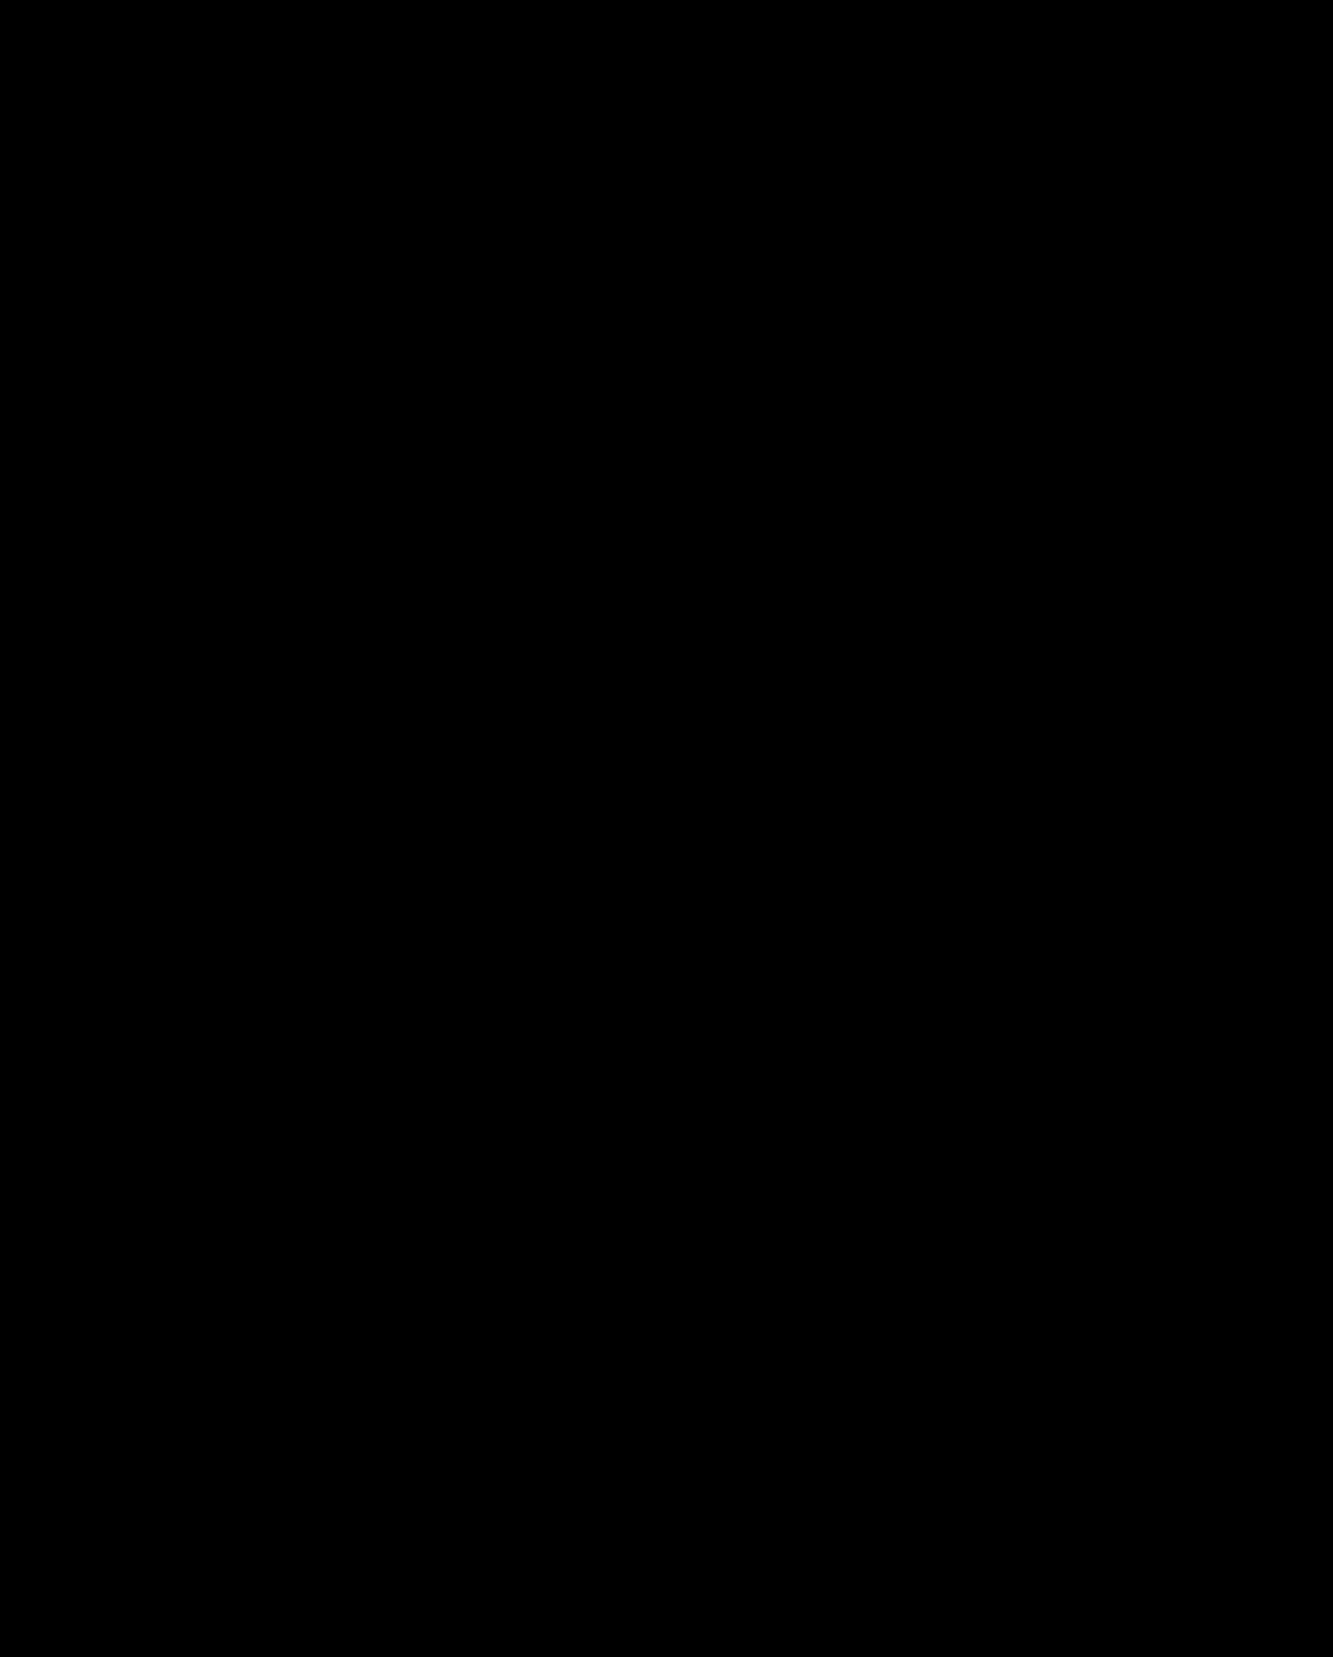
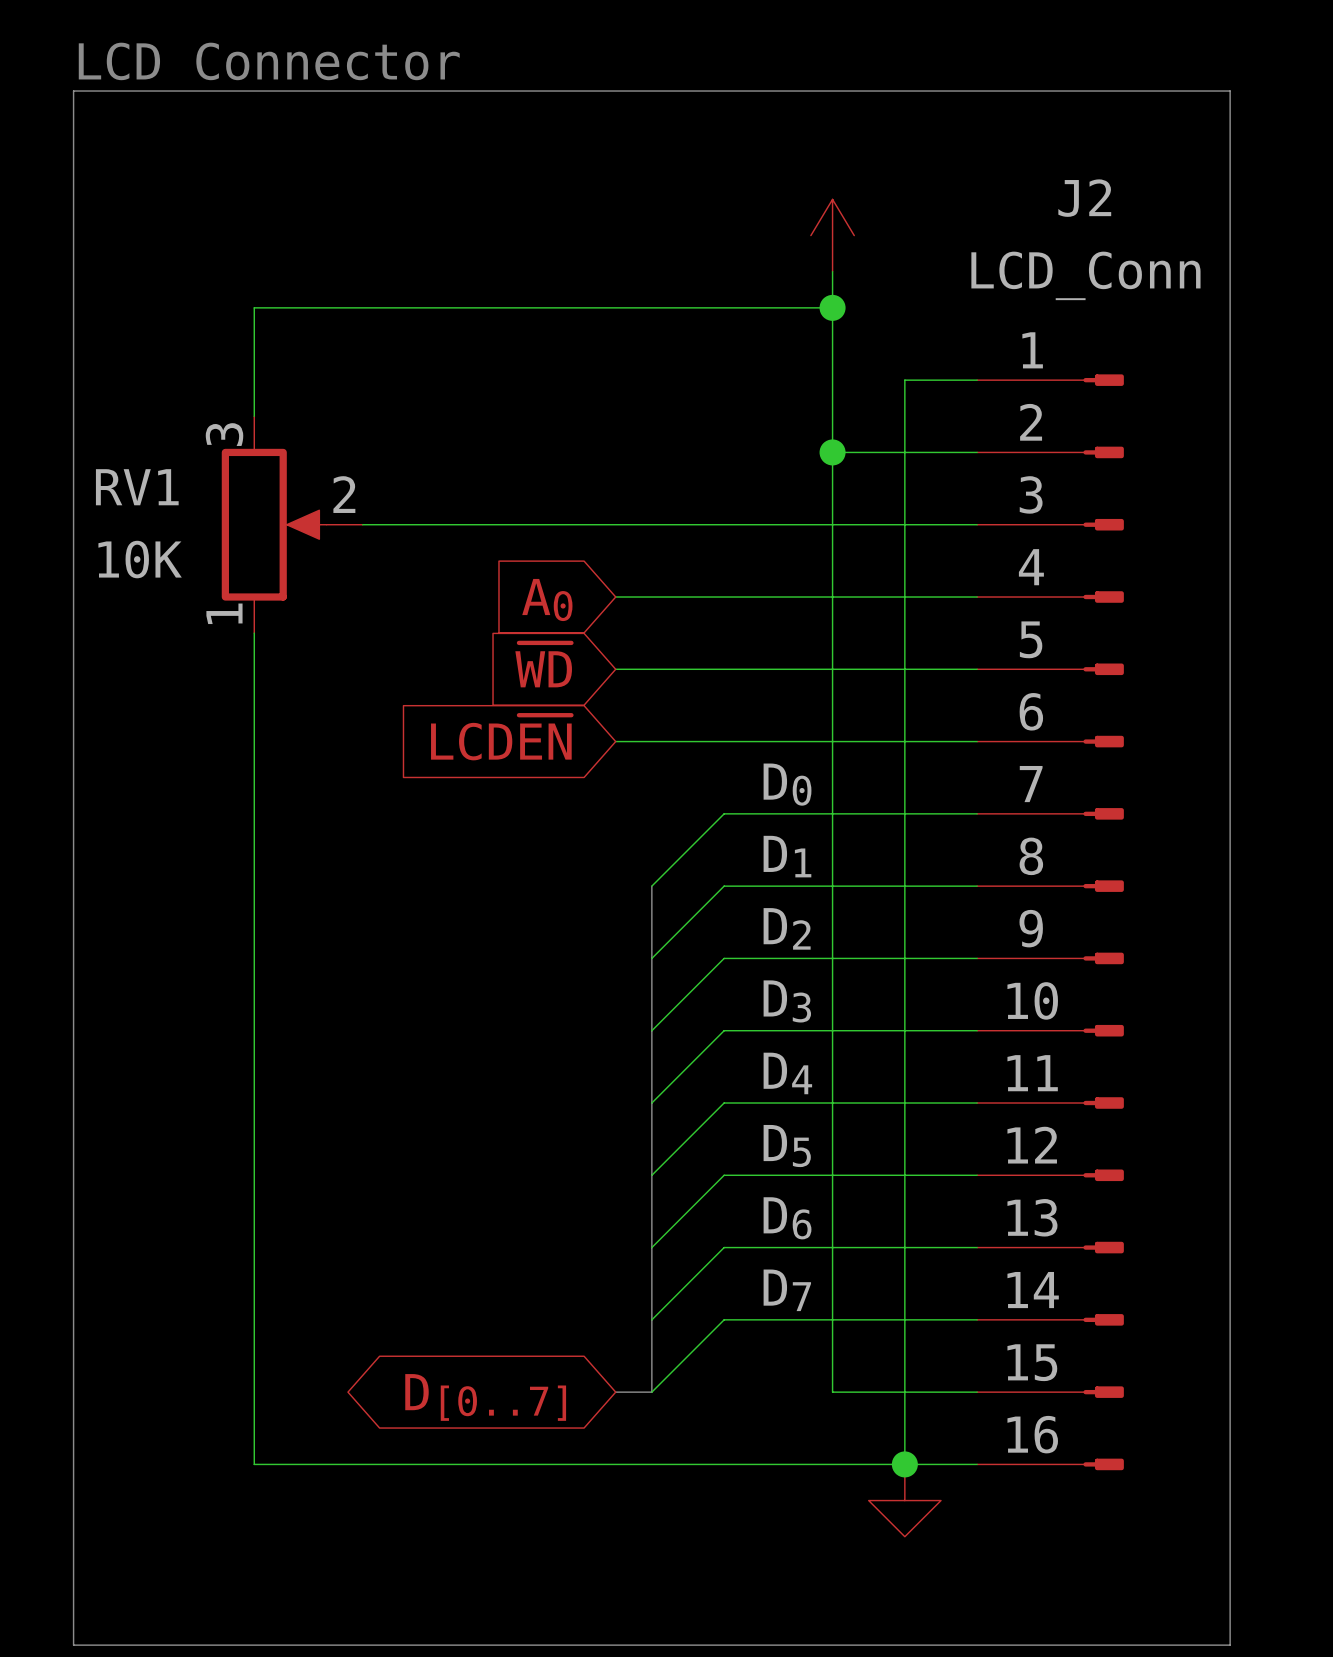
text: none -> LCD Connector (269, 61)
line: none -> (73, 91) (73, 1645) (1230, 1645) (1230, 91) (73, 91)
power symbol: none -> (832, 235)
wire: none -> (832, 271) (832, 1392) (977, 1392)
wire: none -> (832, 307) (254, 307) (254, 416)
junction: none -> (832, 307)
wire: none -> (977, 380) (904, 380) (904, 1464)
wire: none -> (832, 452) (977, 452)
junction: none -> (832, 452)
RV1: none -> 10K (292, 524)
wire: none -> (362, 524) (977, 524)
wire: none -> (615, 597) (977, 597)
global label: none -> A0 (547, 600)
wire: none -> (254, 633) (254, 1464) (977, 1464)
global label: none -> ~{WD} (543, 665)
wire: none -> (615, 669) (977, 669)
global label: none -> LCD~{EN} (501, 737)
wire: none -> (615, 741) (977, 741)
label: none -> D0 (787, 784)
wire: none -> (977, 813) (724, 813) (651, 886)
label: none -> D1 (787, 856)
bus: none -> (651, 886) (651, 1392) (615, 1392)
wire: none -> (977, 886) (724, 886) (651, 958)
J2: none -> LCD_Conn (1050, 922)
label: none -> D2 (787, 928)
wire: none -> (977, 958) (724, 958) (651, 1030)
label: none -> D3 (787, 1001)
wire: none -> (977, 1030) (724, 1030) (651, 1103)
label: none -> D4 (787, 1073)
wire: none -> (977, 1103) (724, 1103) (651, 1175)
label: none -> D5 (787, 1146)
wire: none -> (977, 1175) (724, 1175) (651, 1247)
label: none -> D6 (787, 1218)
wire: none -> (977, 1247) (724, 1247) (651, 1319)
label: none -> D7 (787, 1290)
wire: none -> (977, 1319) (724, 1319) (651, 1392)
global label: none -> D[0..7] (485, 1397)
junction: none -> (904, 1464)
power symbol: none -> (904, 1500)

